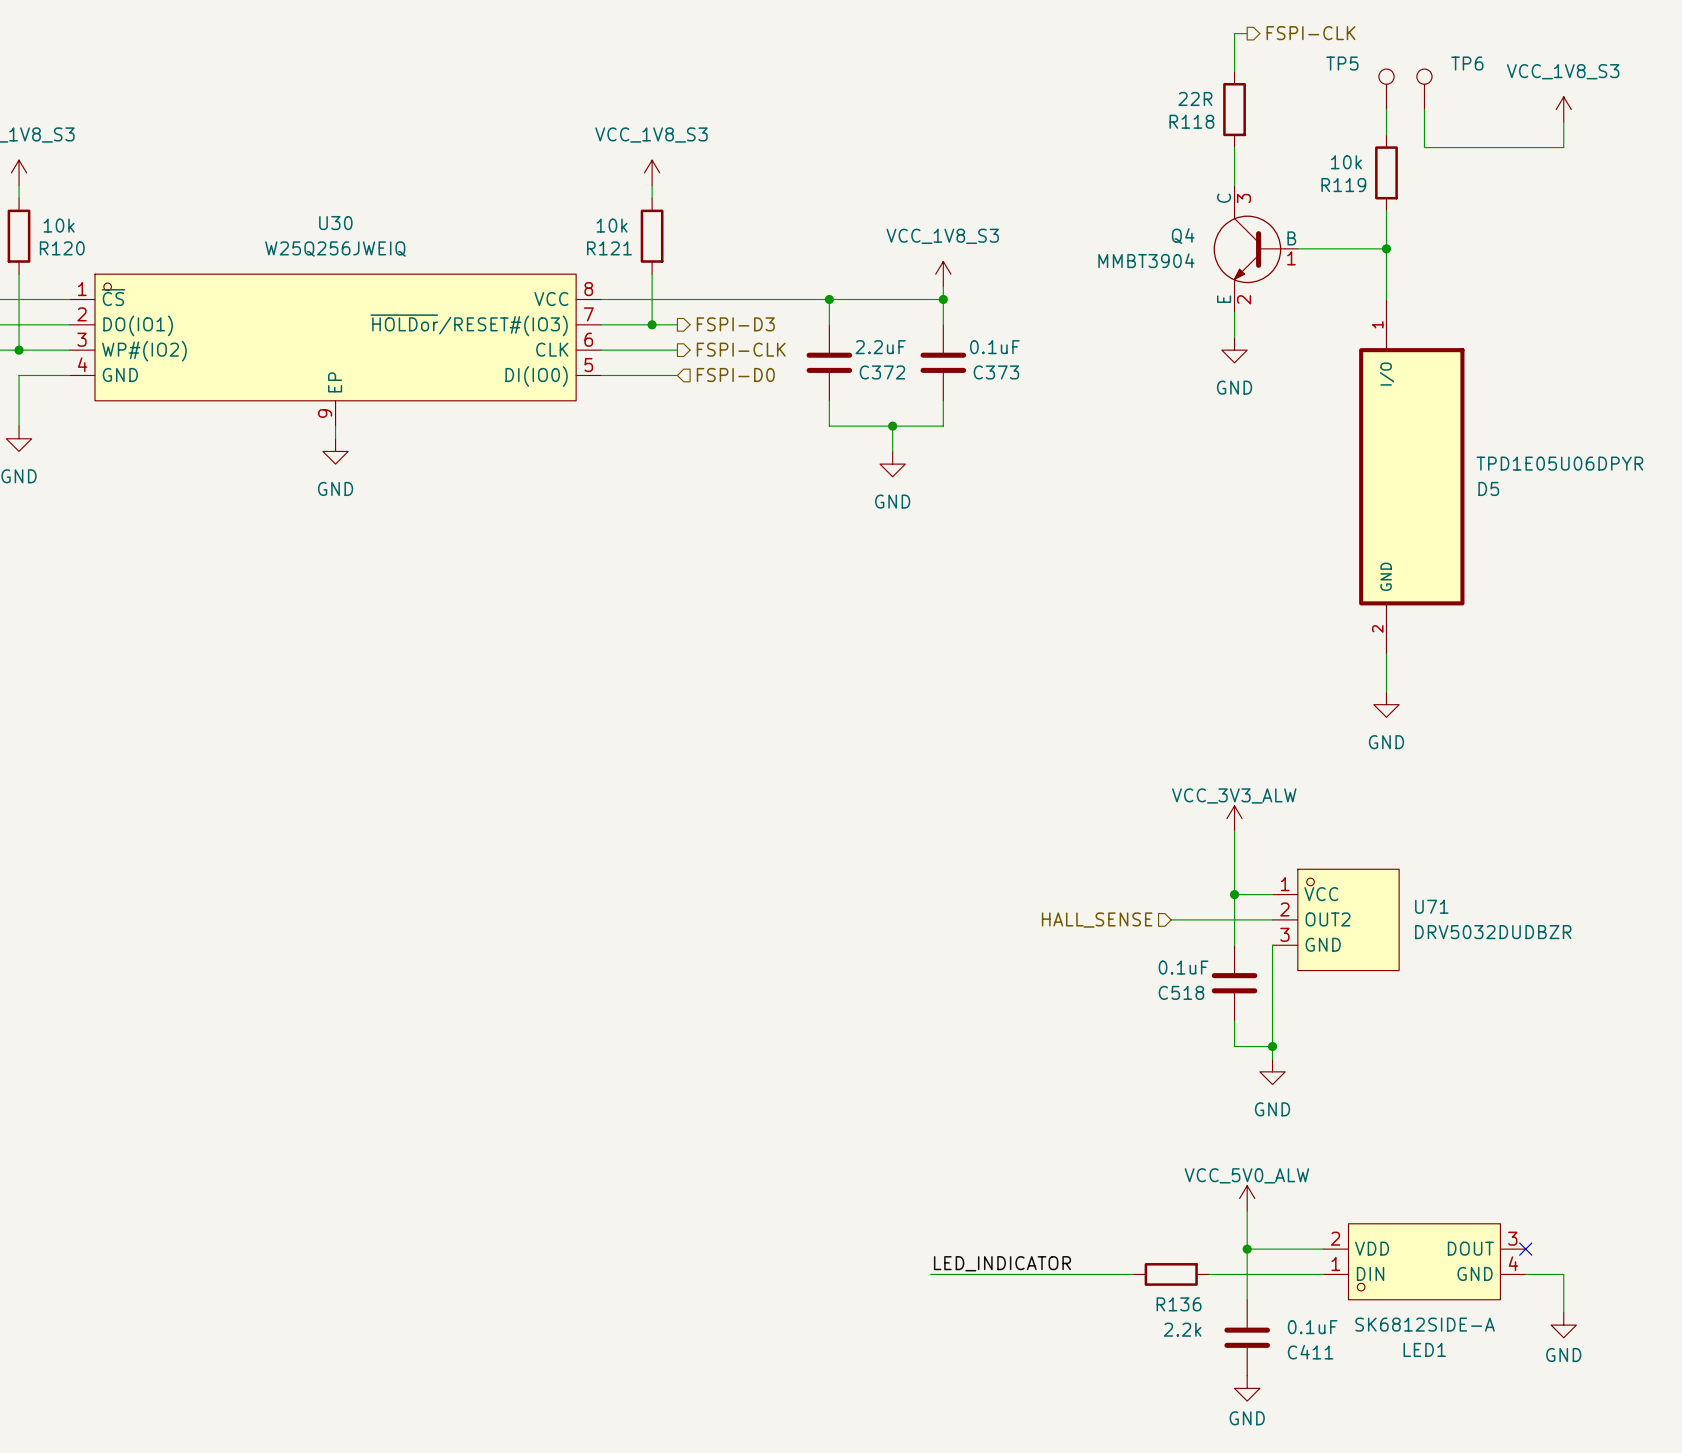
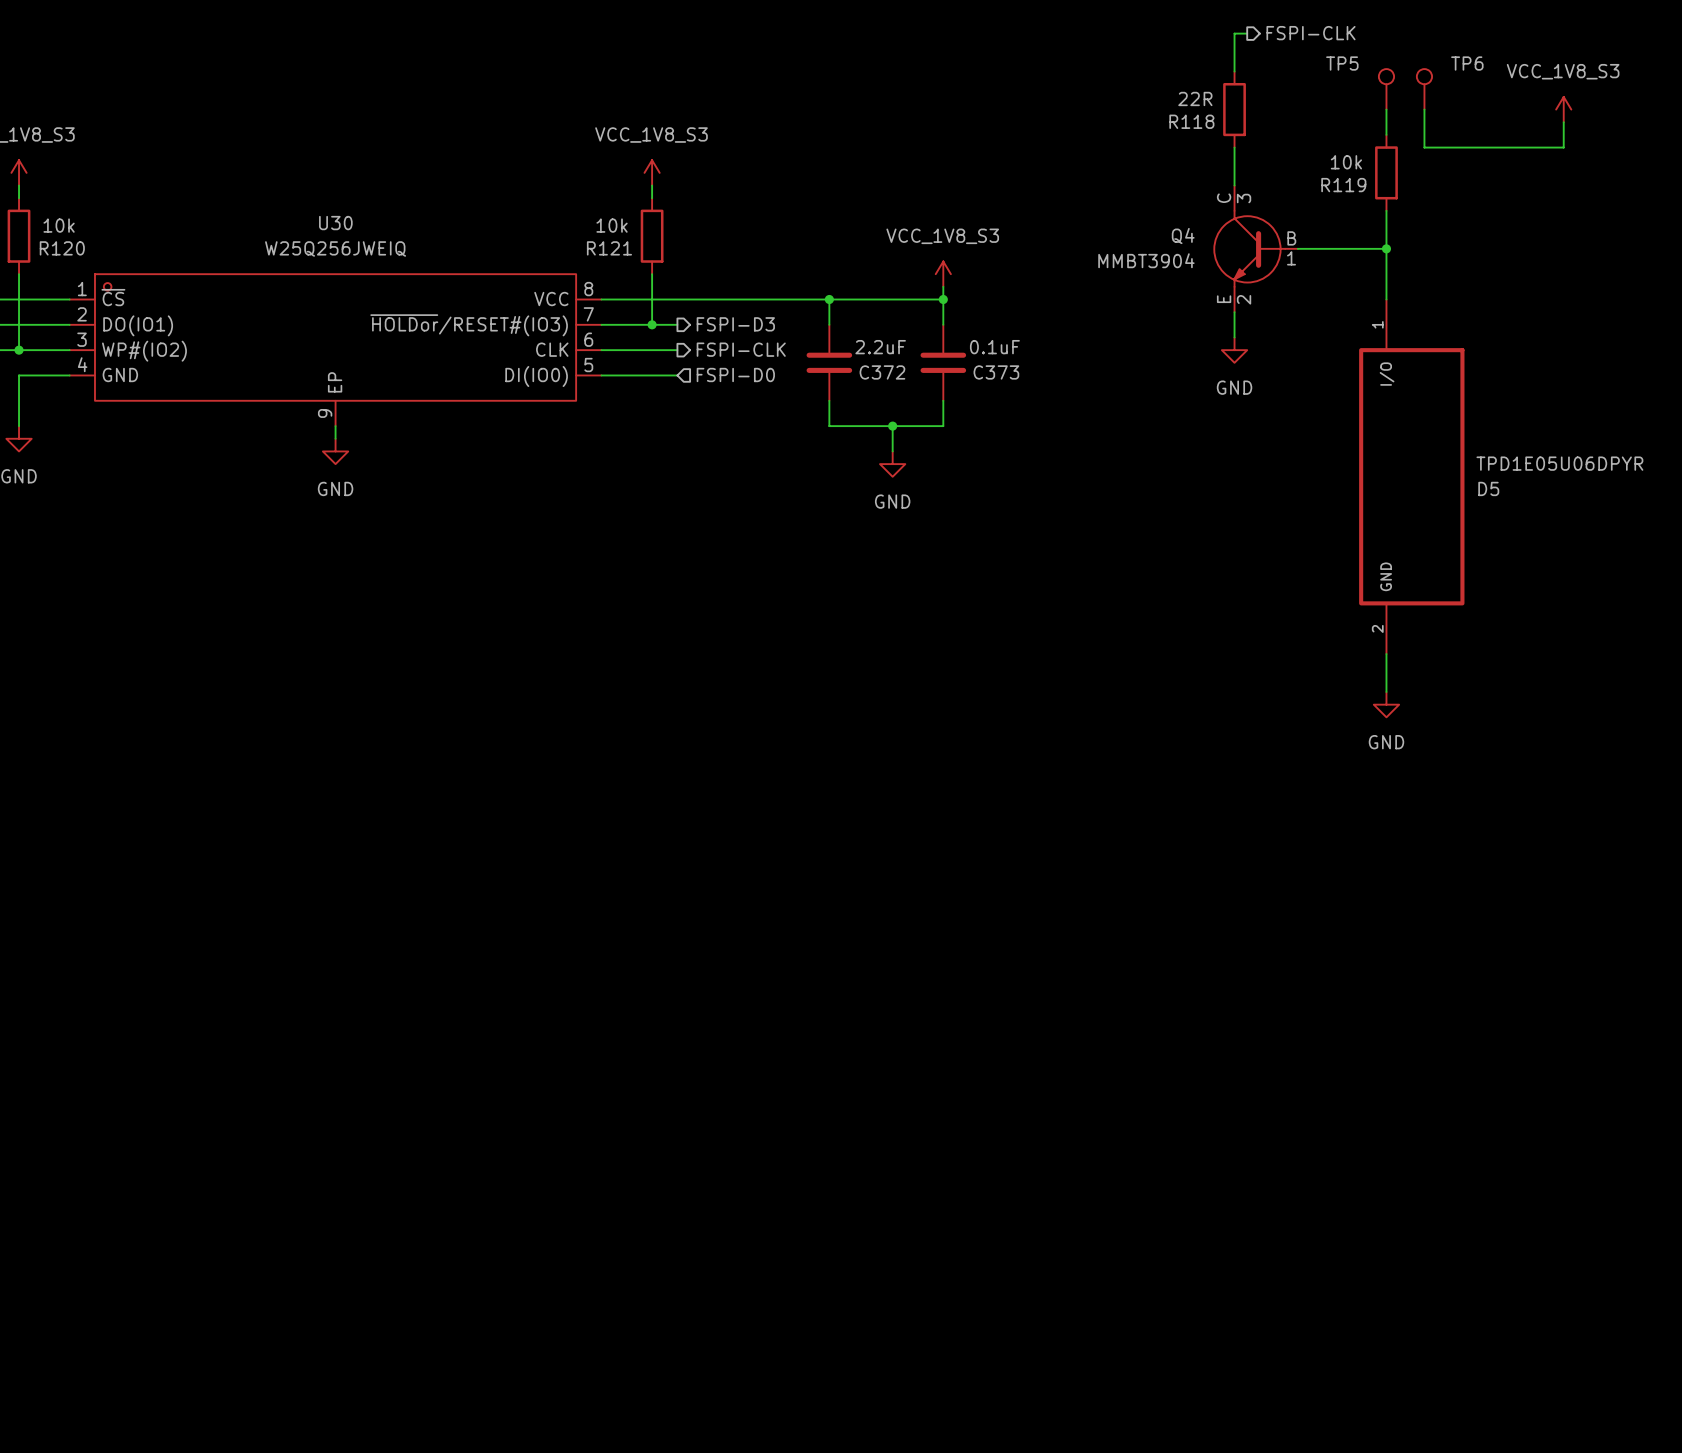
power symbol: VCC_3V3_ALW (1234, 818) -> none
wire: (1234, 831) (1234, 945) -> none
wire: (1234, 894) (1272, 894) -> none
junction: (1234, 894) -> none
wire: (1171, 919) (1272, 919) -> none
U71: DRV5032DUDBZR (1335, 919) -> none
hierarchical label: HALL_SENSE (1097, 920) -> none
wire: (1272, 945) (1272, 1059) -> none
C518: 0.1uF (1234, 983) -> none
wire: (1234, 1021) (1234, 1046) (1272, 1046) -> none
junction: (1272, 1046) -> none
power symbol: GND (1272, 1071) -> none
power symbol: VCC_5V0_ALW (1247, 1198) -> none
wire: (1247, 1211) (1247, 1299) -> none
wire: (1247, 1249) (1323, 1249) -> none
junction: (1247, 1249) -> none
no-connect mark: (1525, 1249) -> none
LED1: SK6812SIDE-A (1424, 1261) -> none
label: LED_INDICATOR (1002, 1263) -> none
wire: (930, 1274) (1133, 1274) -> none
R136: 2.2k (1171, 1274) -> none
wire: (1209, 1274) (1323, 1274) -> none
wire: (1525, 1274) (1563, 1274) (1563, 1312) -> none
power symbol: GND (1563, 1325) -> none
C411: 0.1uF (1247, 1337) -> none
power symbol: GND (1247, 1388) -> none

